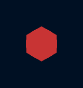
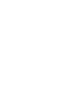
part: (41, 43) -> none

